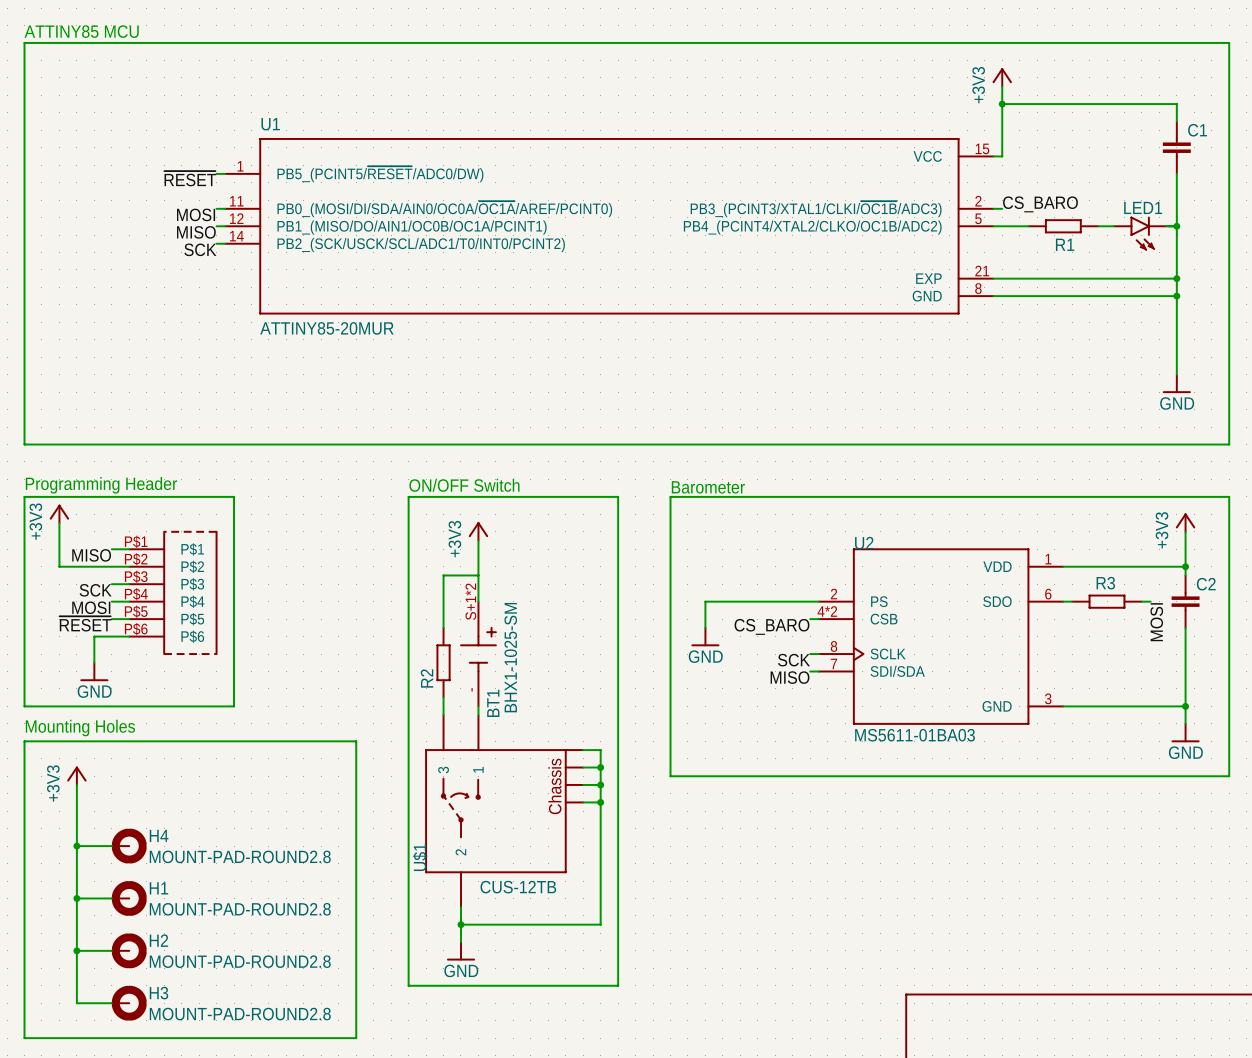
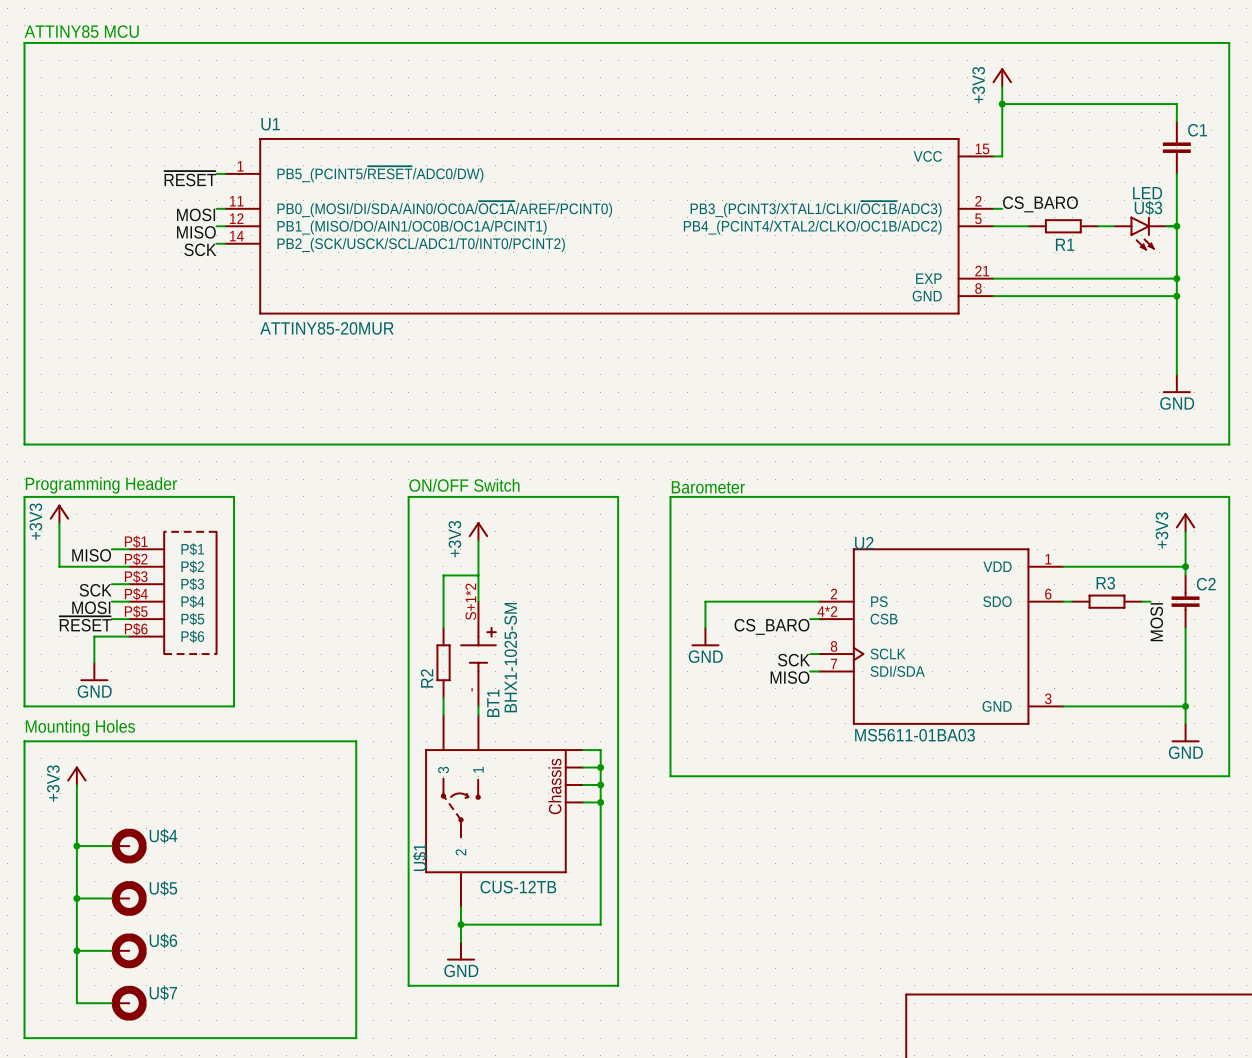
LED1 value: none -> LED (1147, 193)
LED1 name: LED1 (1143, 207) -> U$3 (1148, 208)
H4 name: H4 (159, 835) -> U$4 (163, 836)
H4 value: MOUNT-PAD-ROUND2.8 (240, 856) -> none
H1 name: H1 (158, 888) -> U$5 (163, 888)
H1 value: MOUNT-PAD-ROUND2.8 (240, 909) -> none
H2 name: H2 (158, 940) -> U$6 (163, 940)
H2 value: MOUNT-PAD-ROUND2.8 (240, 961) -> none
H3 name: H3 (158, 993) -> U$7 (163, 993)
H3 value: MOUNT-PAD-ROUND2.8 (240, 1014) -> none

